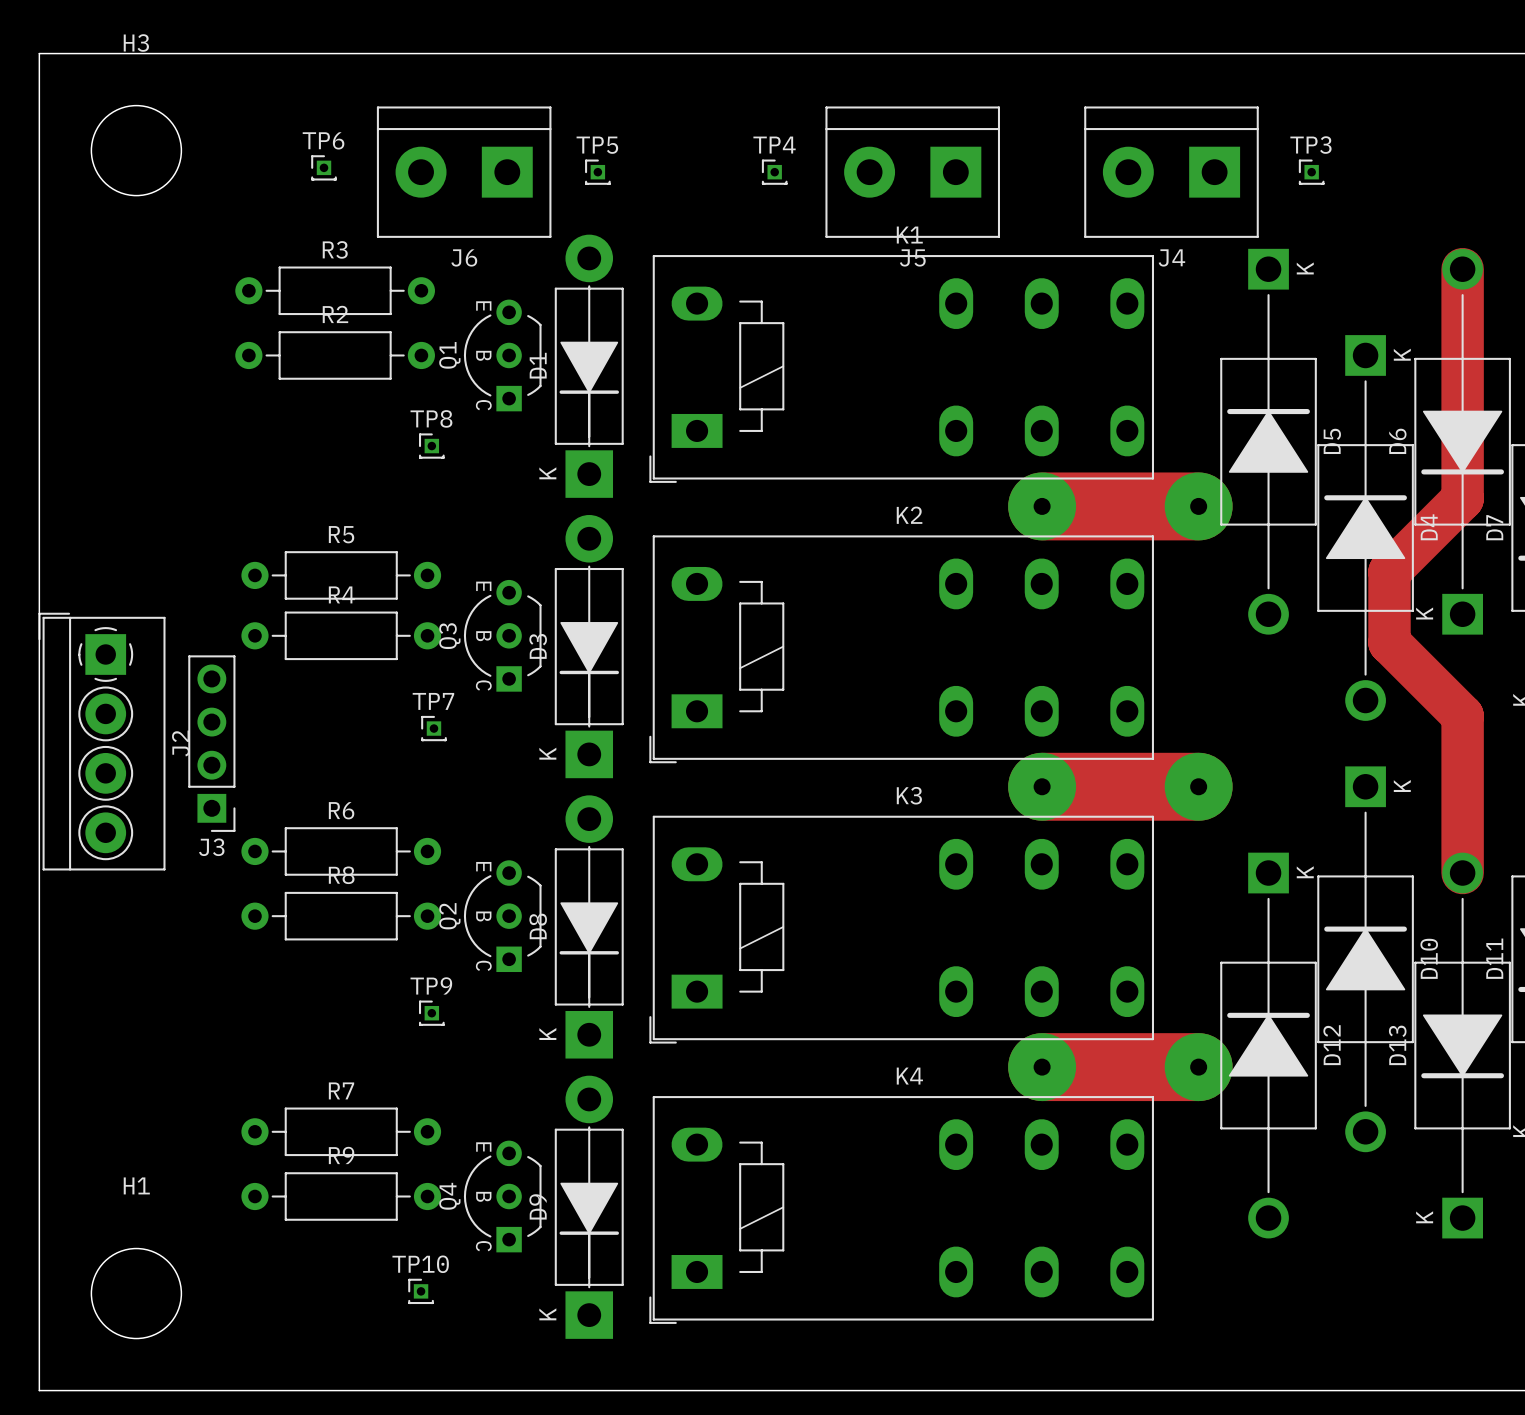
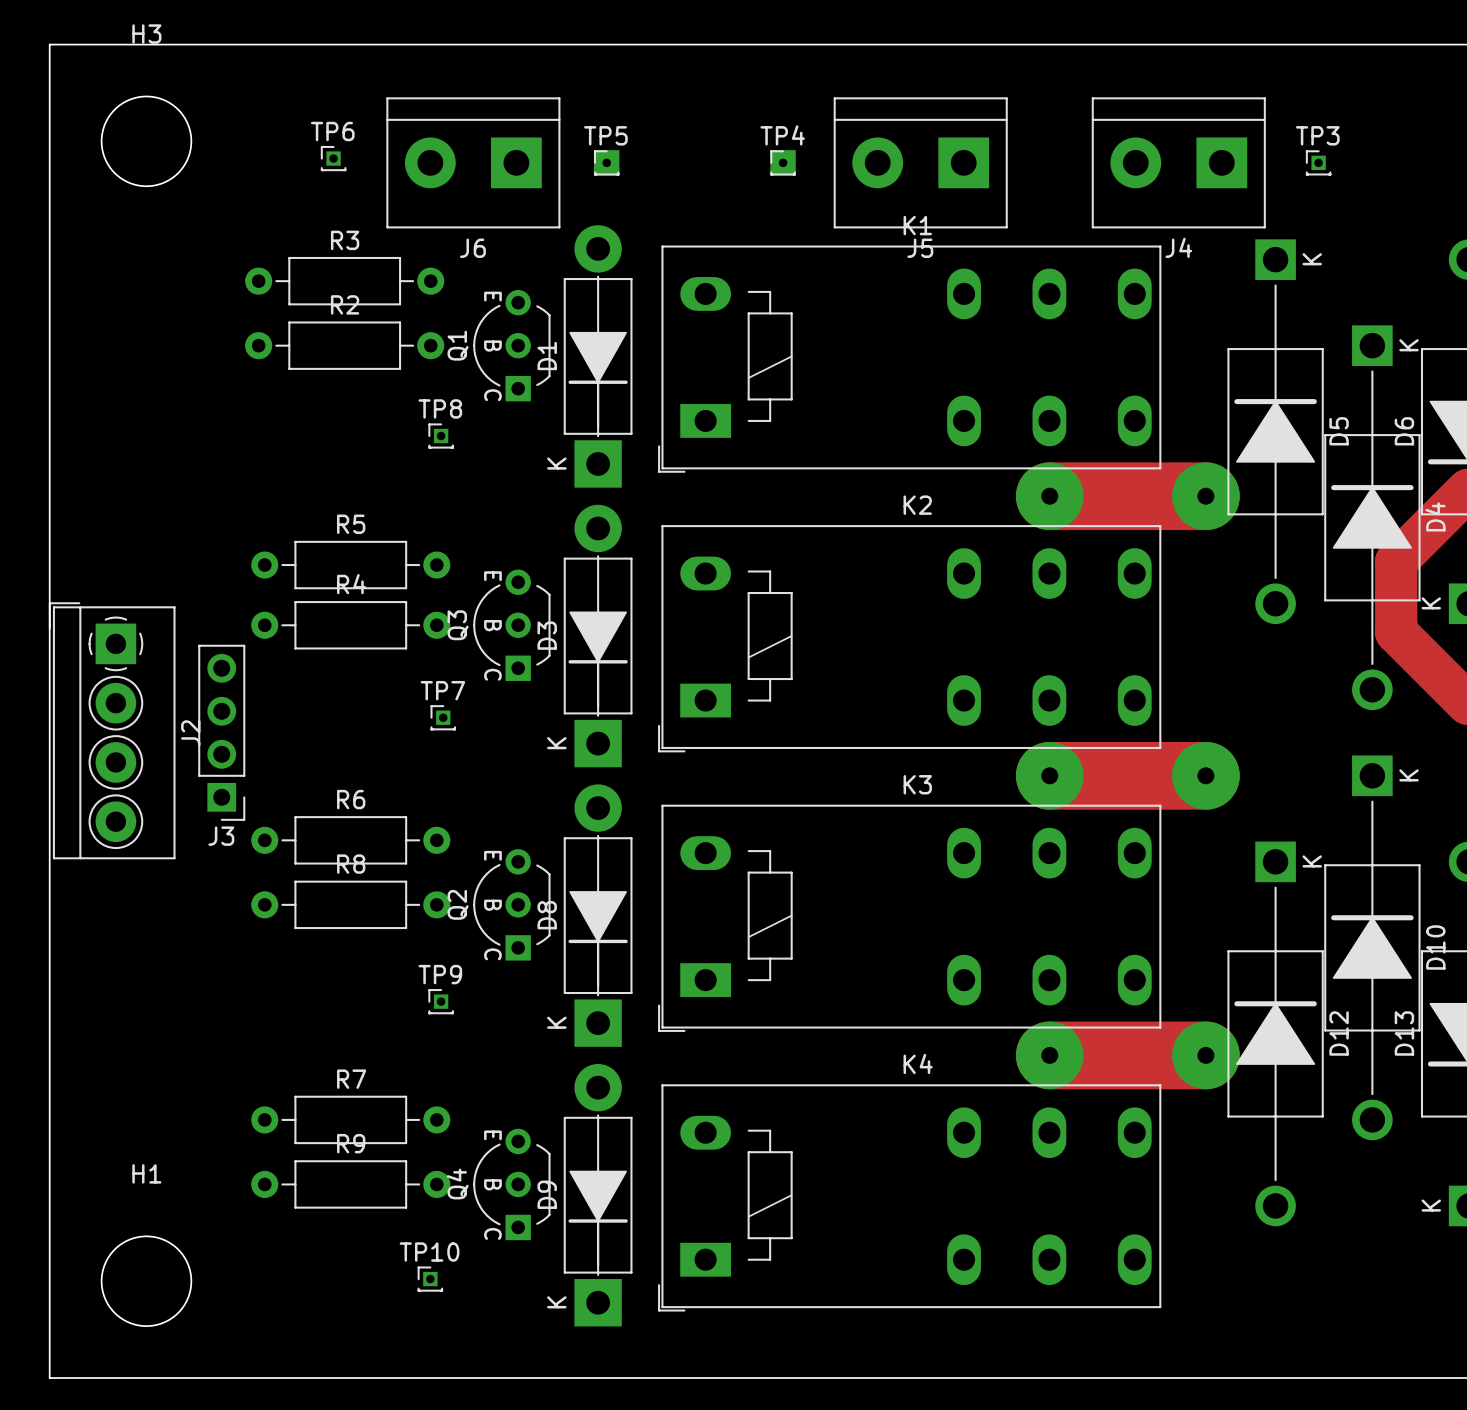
TP5 footprint: [585, 159, 611, 185] -> [593, 150, 620, 176]
TP4 footprint: [761, 159, 788, 185] -> [770, 150, 796, 176]

